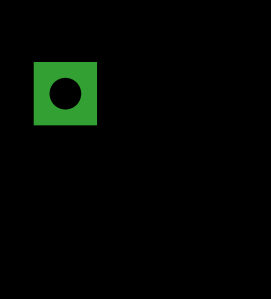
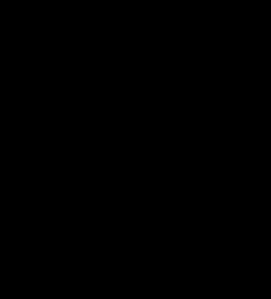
part: (65, 93) -> none

